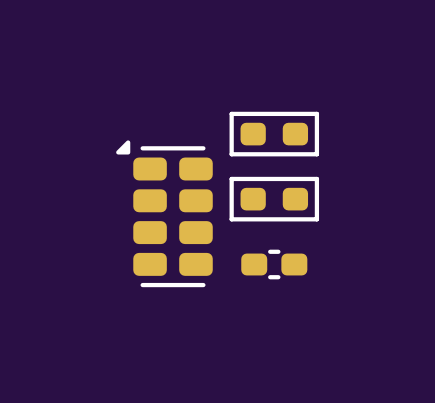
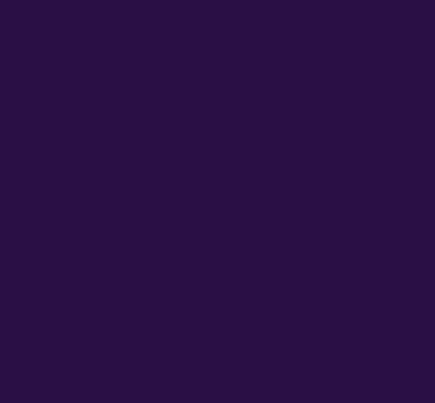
part: (274, 134) -> none
part: (274, 199) -> none
part: (164, 213) -> none
part: (274, 264) -> none

